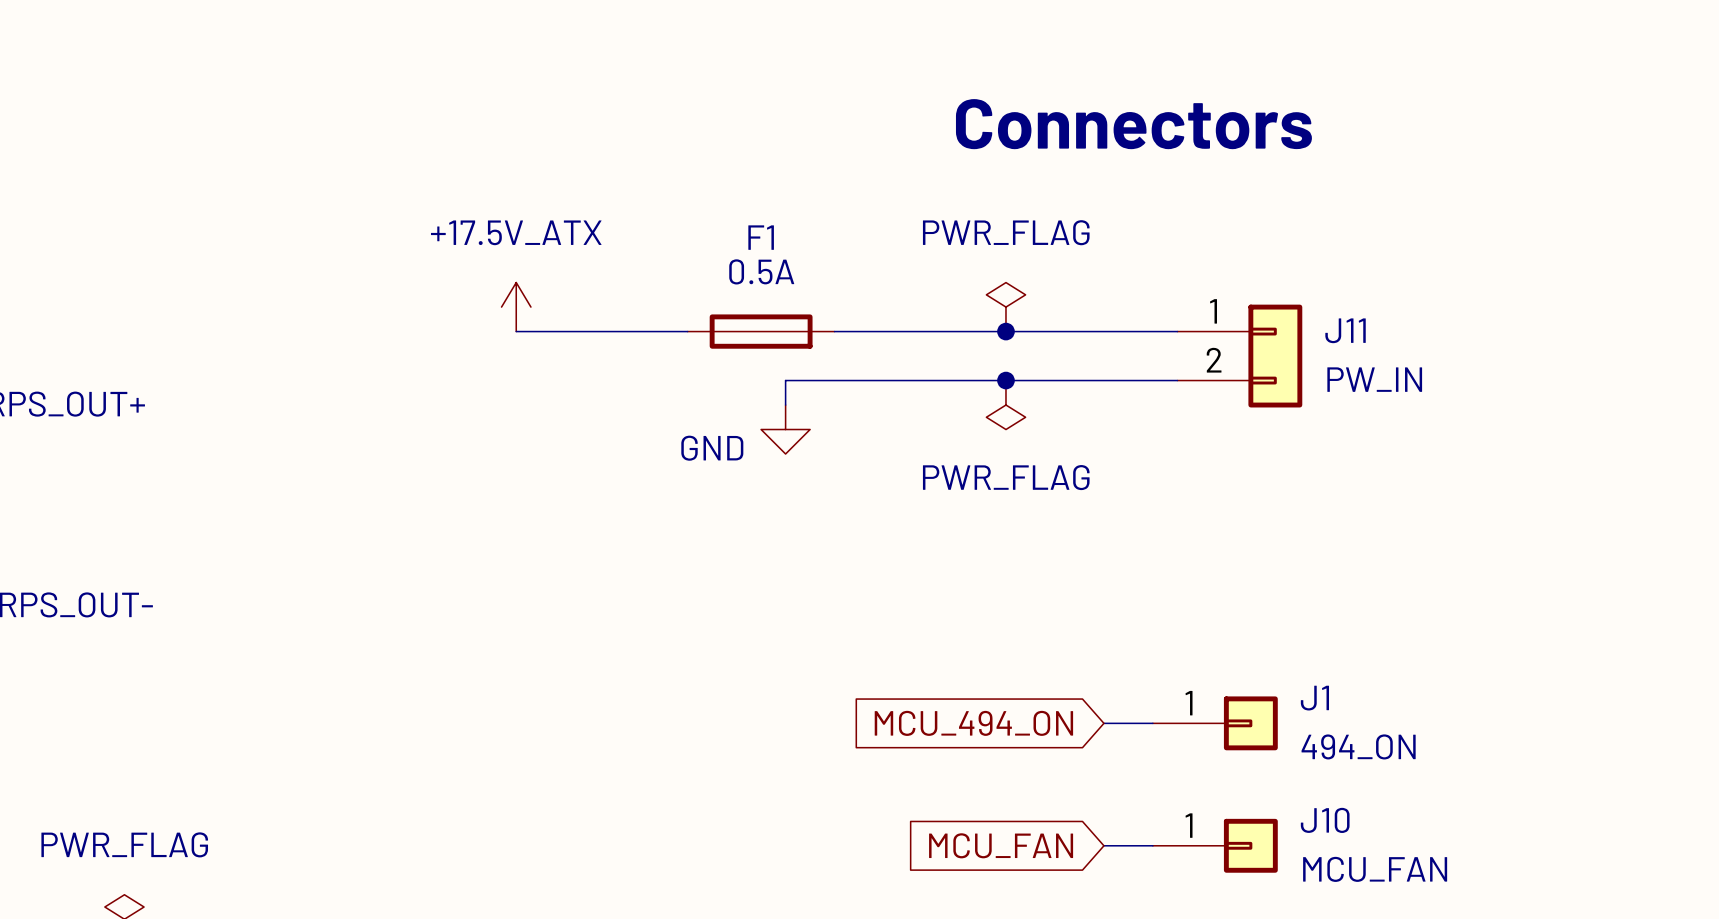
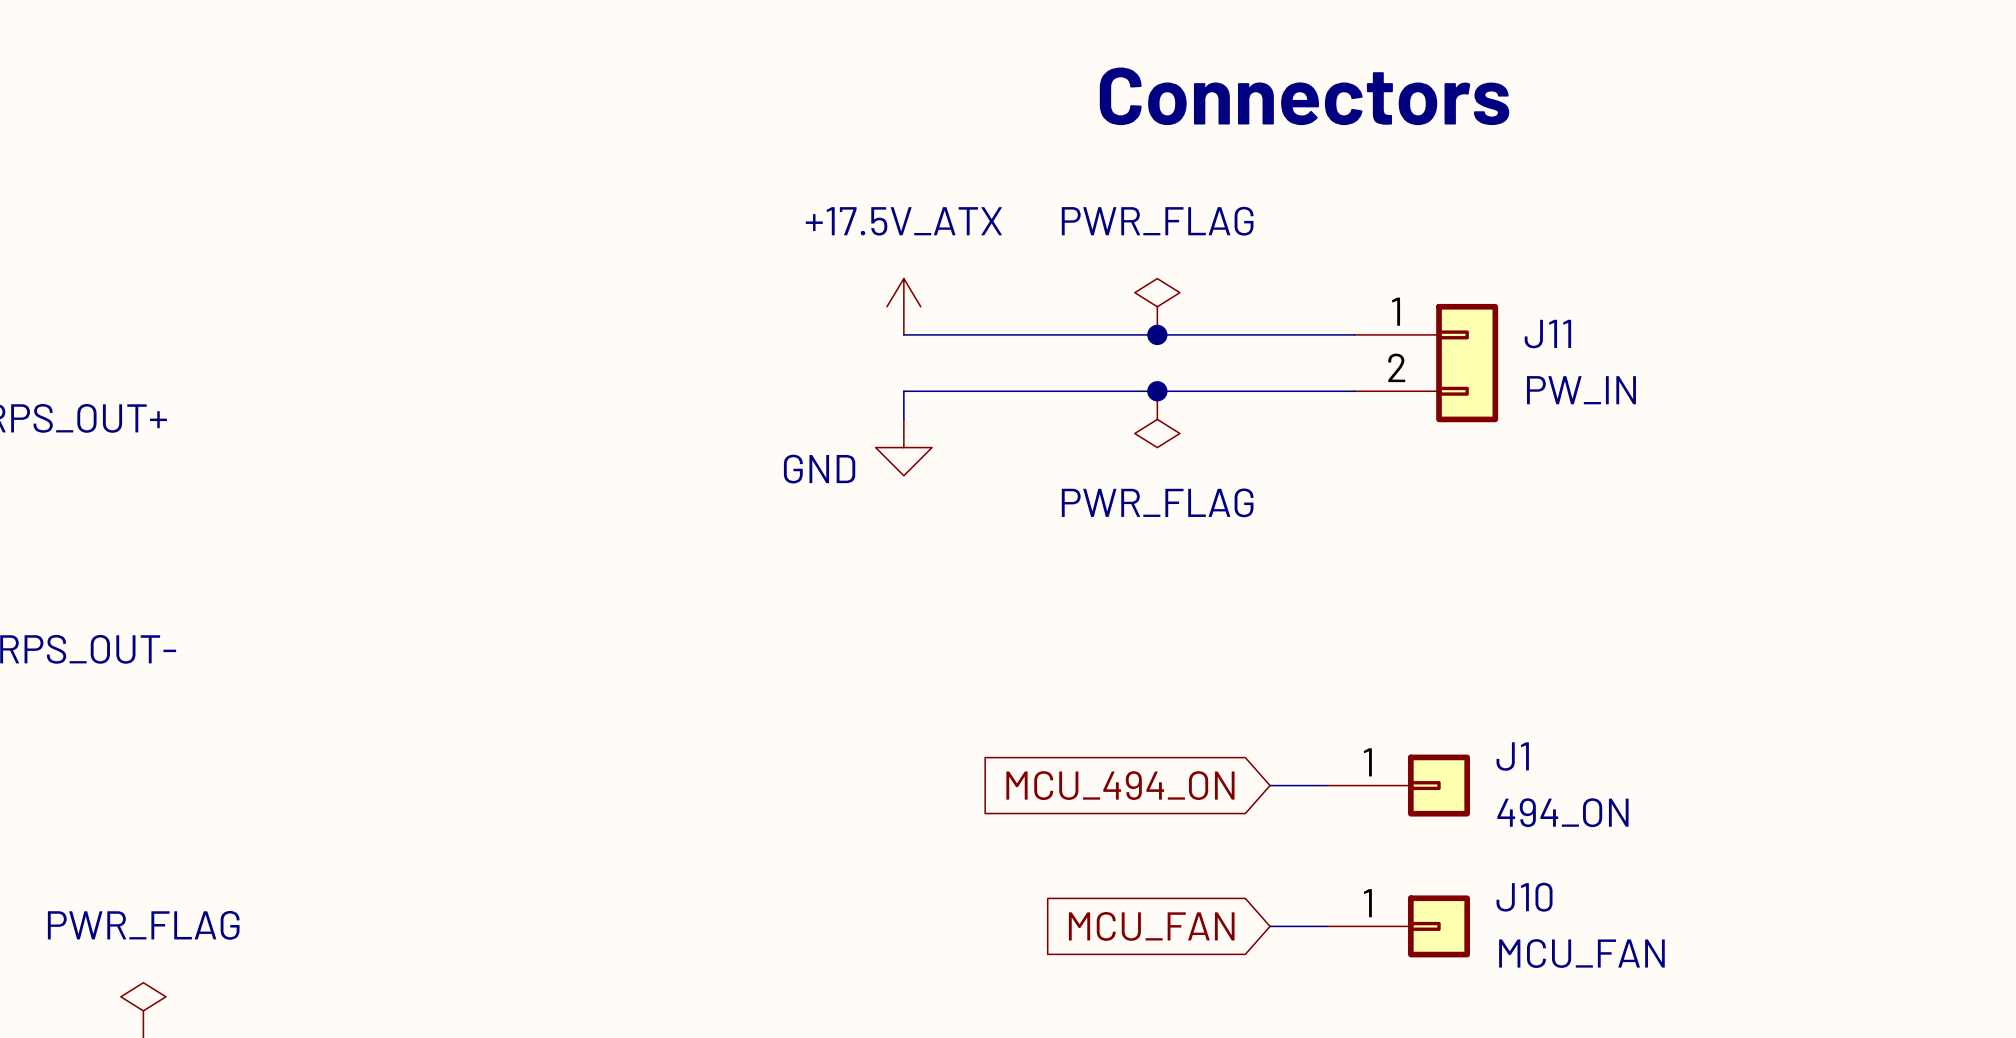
power symbol position: +17.5V_ATX (516, 307) -> +17.5V_ATX (903, 306)
wire: (516, 331) (687, 331) -> none
F1: 0.5A (761, 331) -> none

